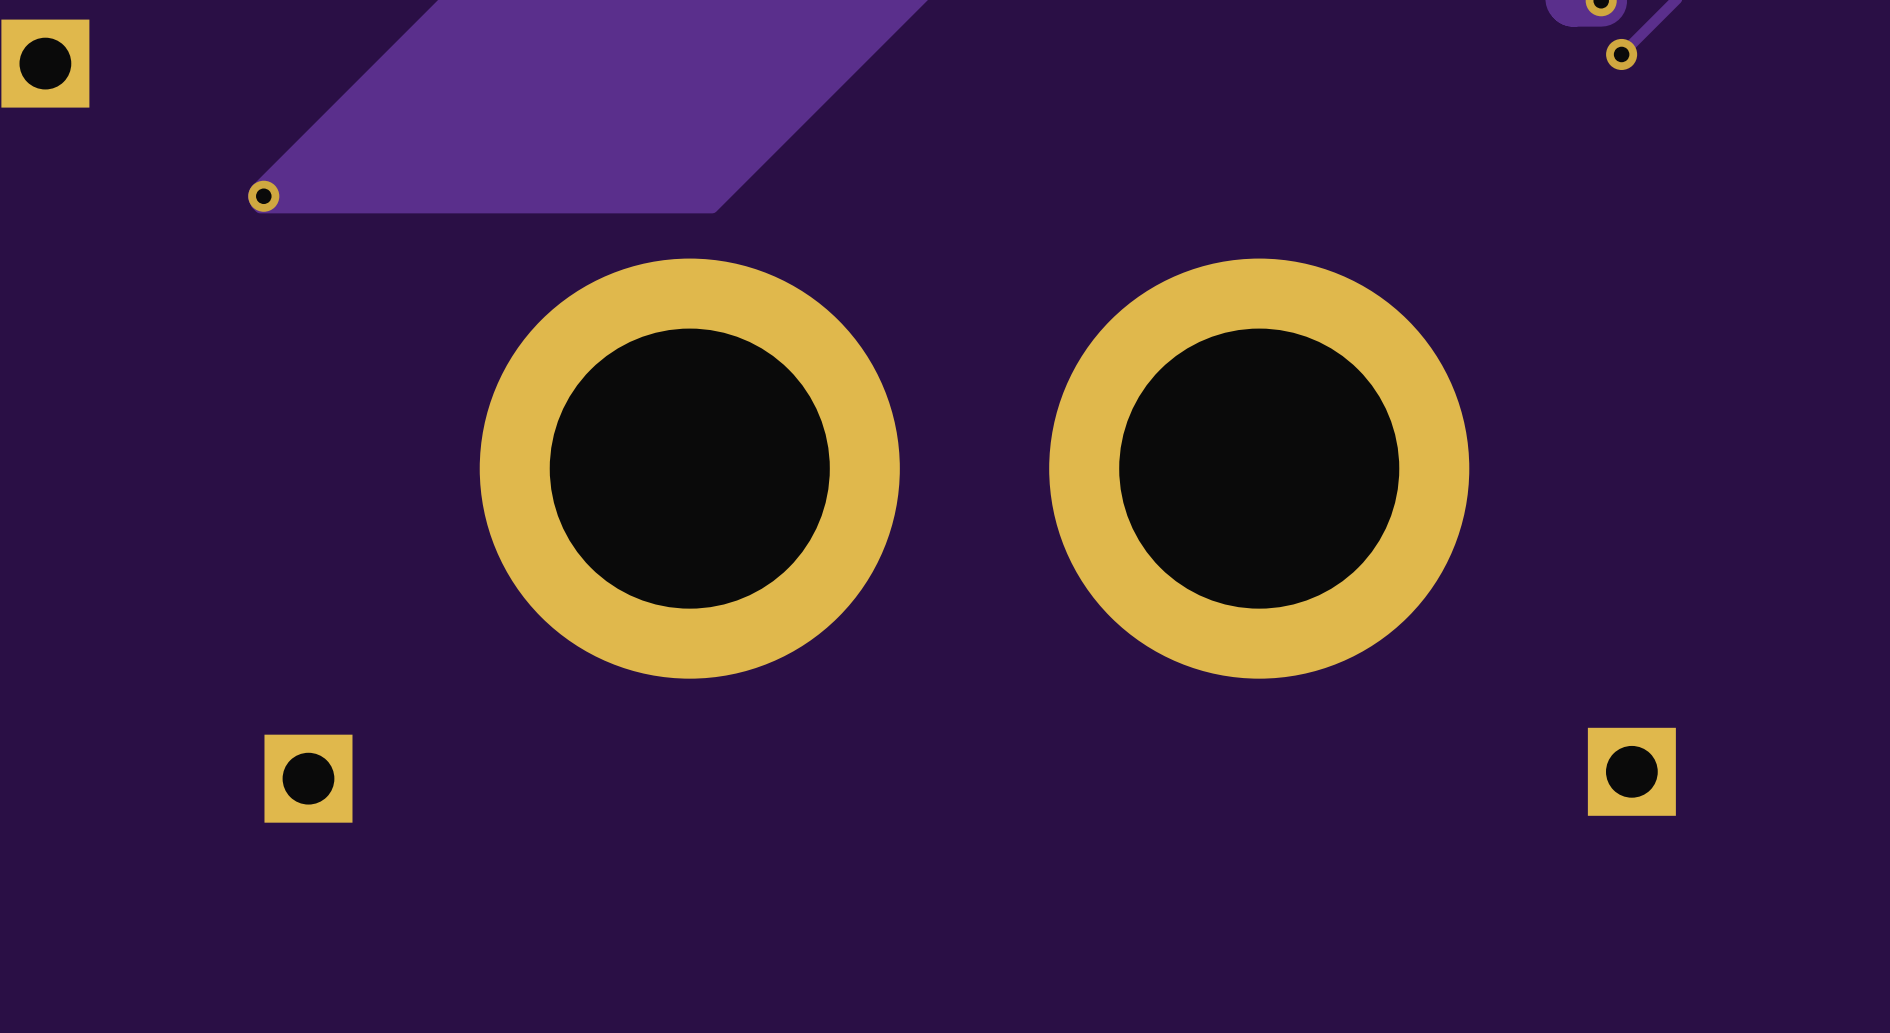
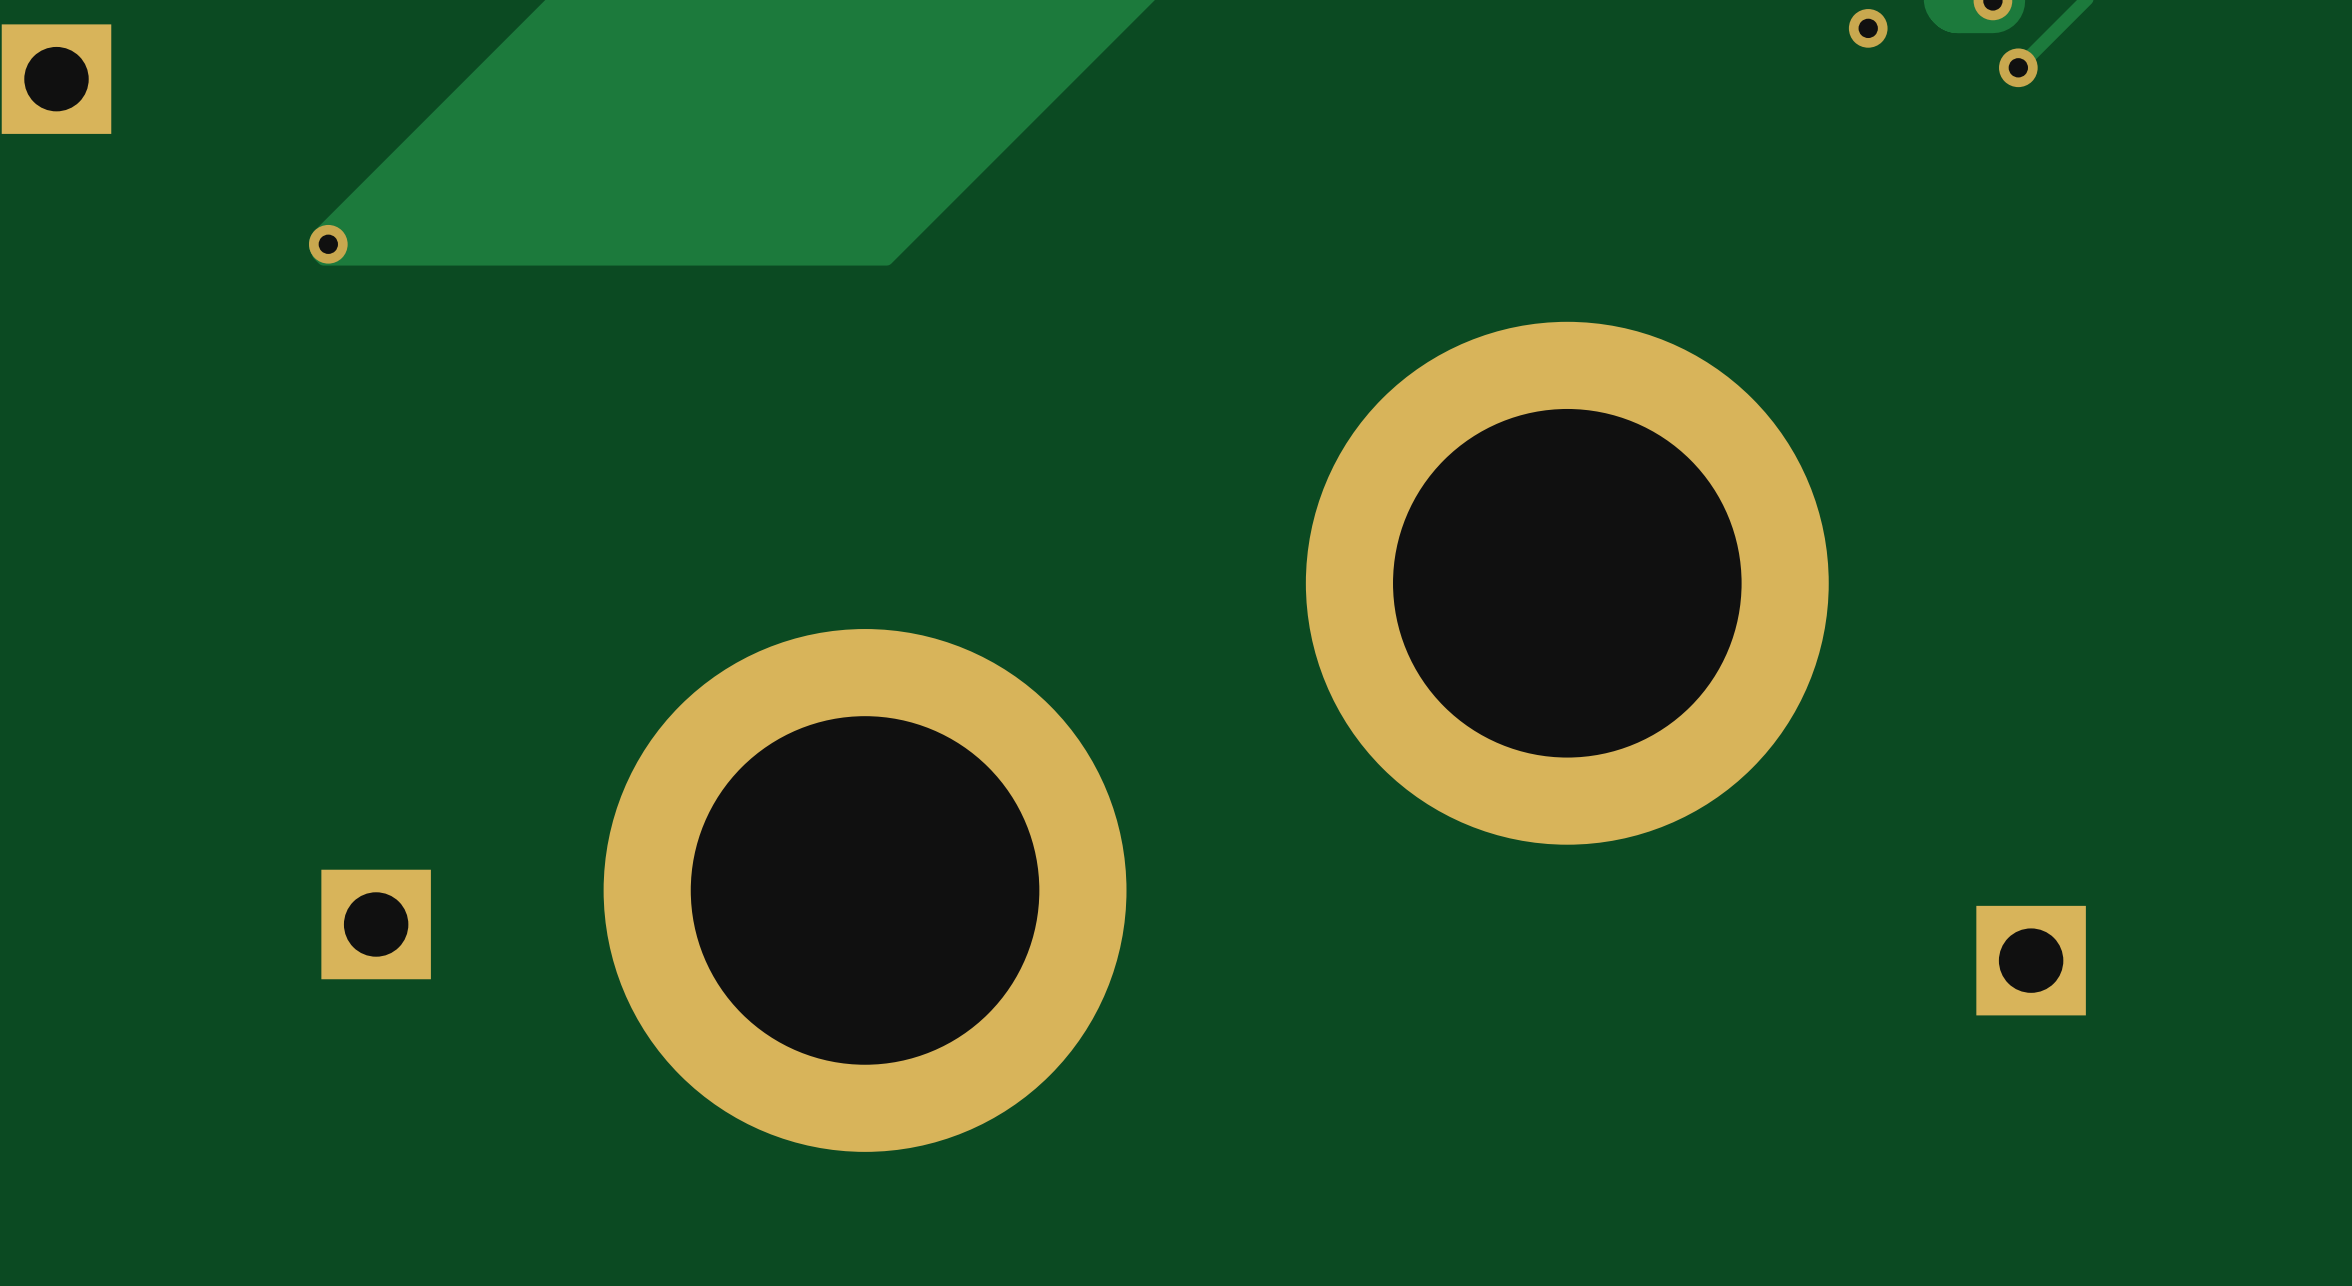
via: none -> (1868, 28)
part position: (689, 468) -> (865, 890)
part position: (308, 778) -> (376, 924)

